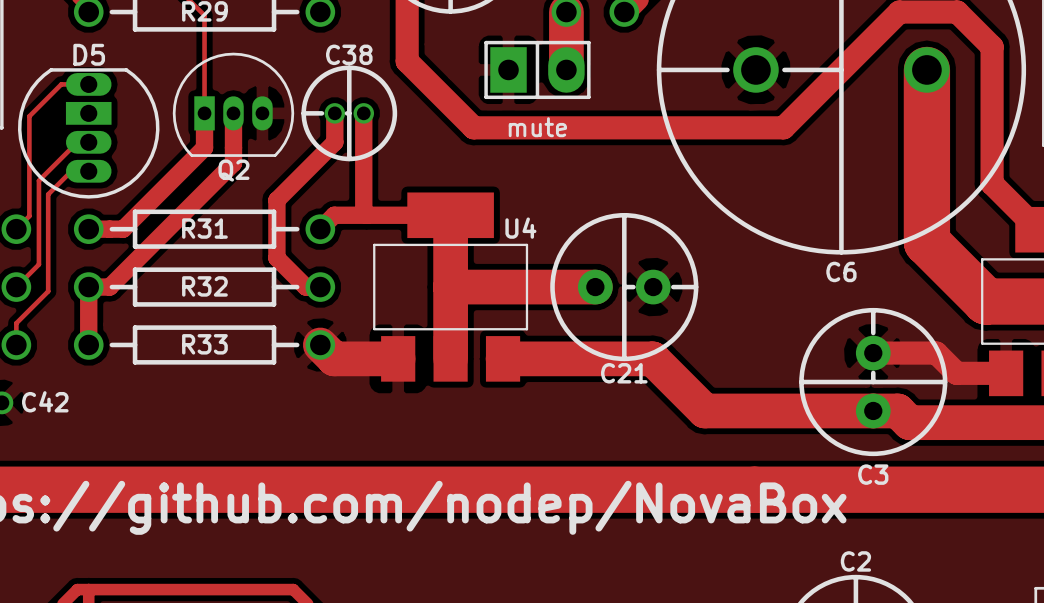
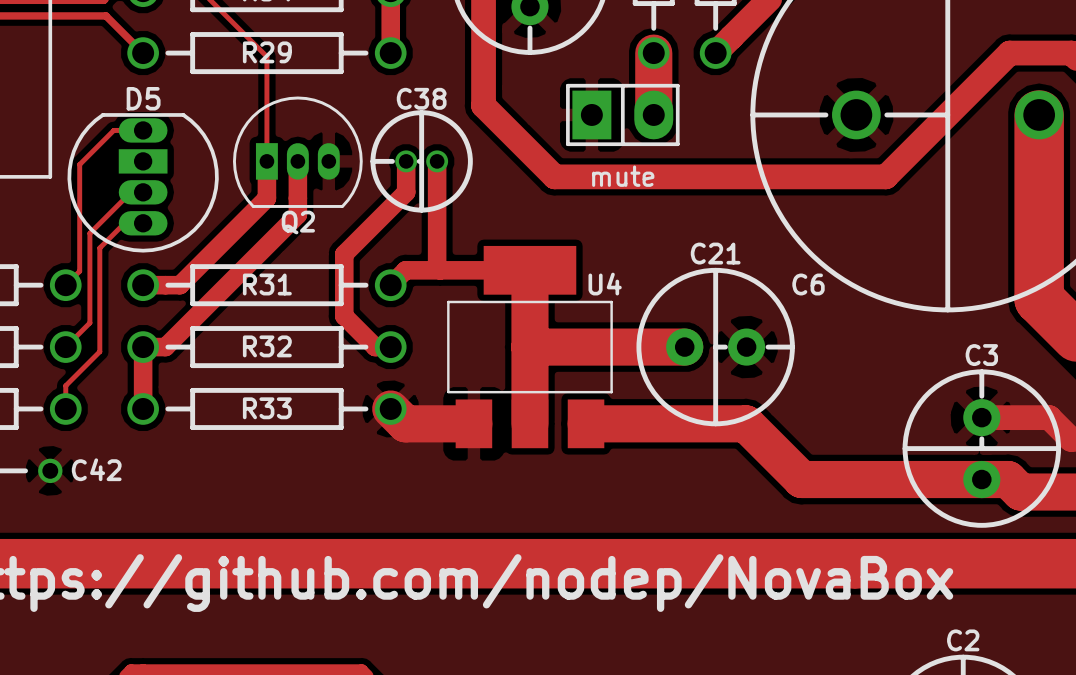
C6 name position: C6 (841, 271) -> C6 (808, 284)
C21 name position: C21 (624, 373) -> C21 (715, 253)
C3 name position: C3 (873, 474) -> C3 (981, 355)

